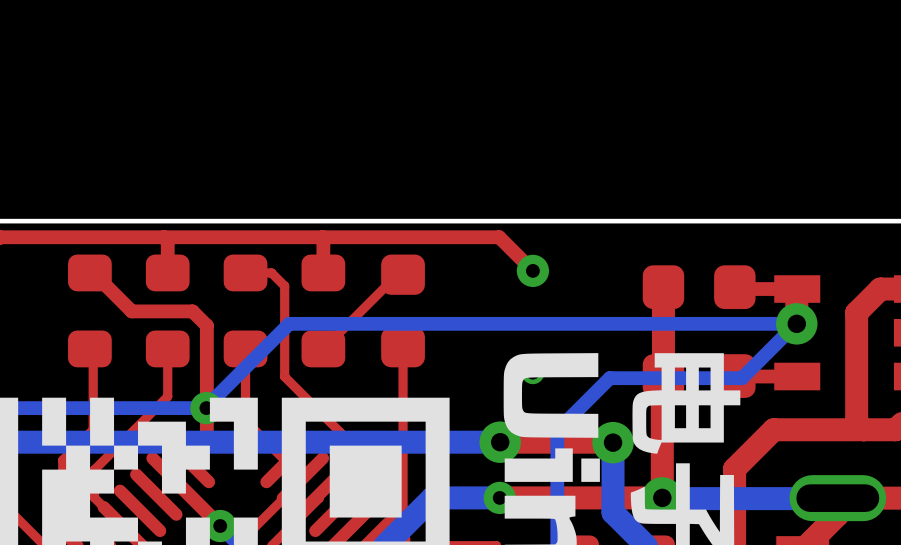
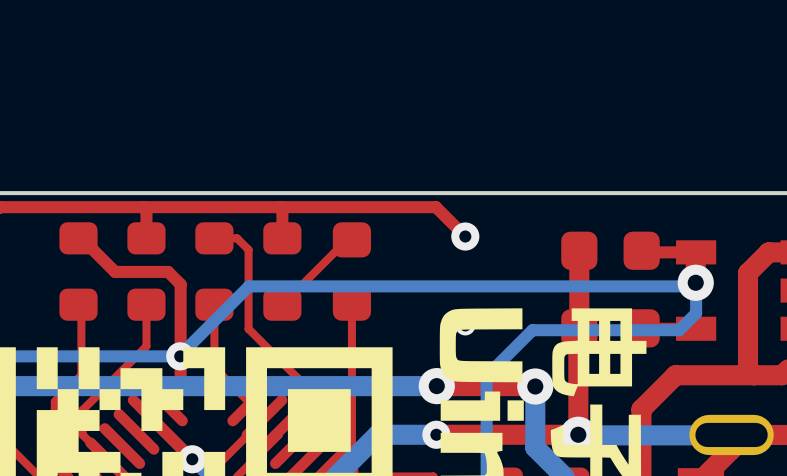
bottom track: (796, 323) (289, 323) (285, 327) -> (647, 330) (679, 330) (696, 313) (696, 286) (248, 286)
bottom track: (796, 323) (741, 378) -> none

